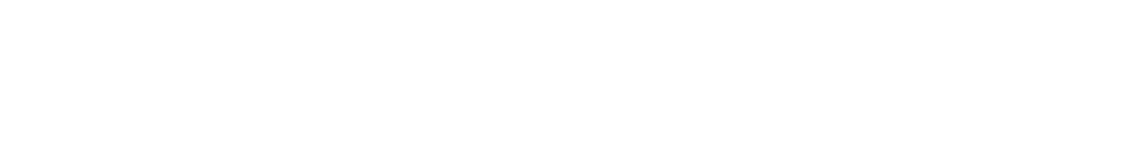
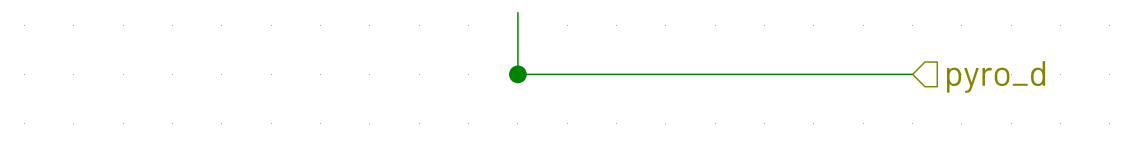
wire: none -> (517, 12) (517, 74)
wire: none -> (512, 74) (912, 74)
junction: none -> (517, 74)
hierarchical label: none -> pyro_d (996, 76)

